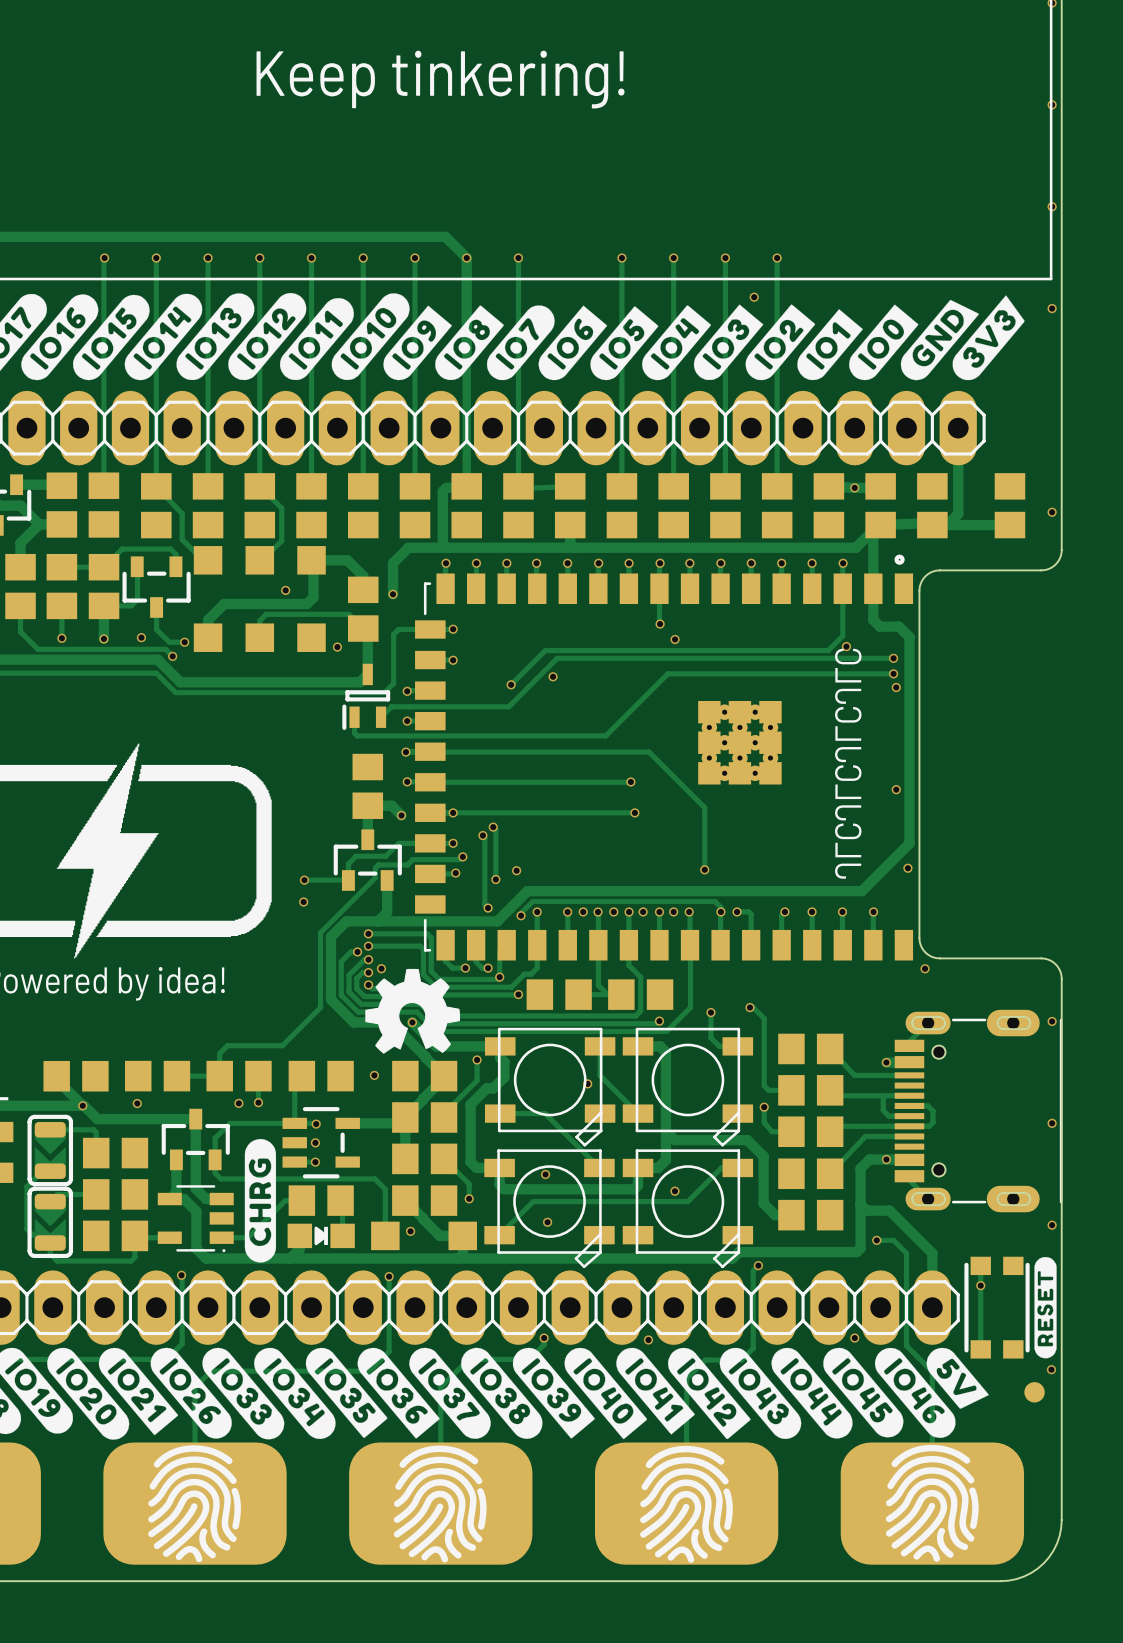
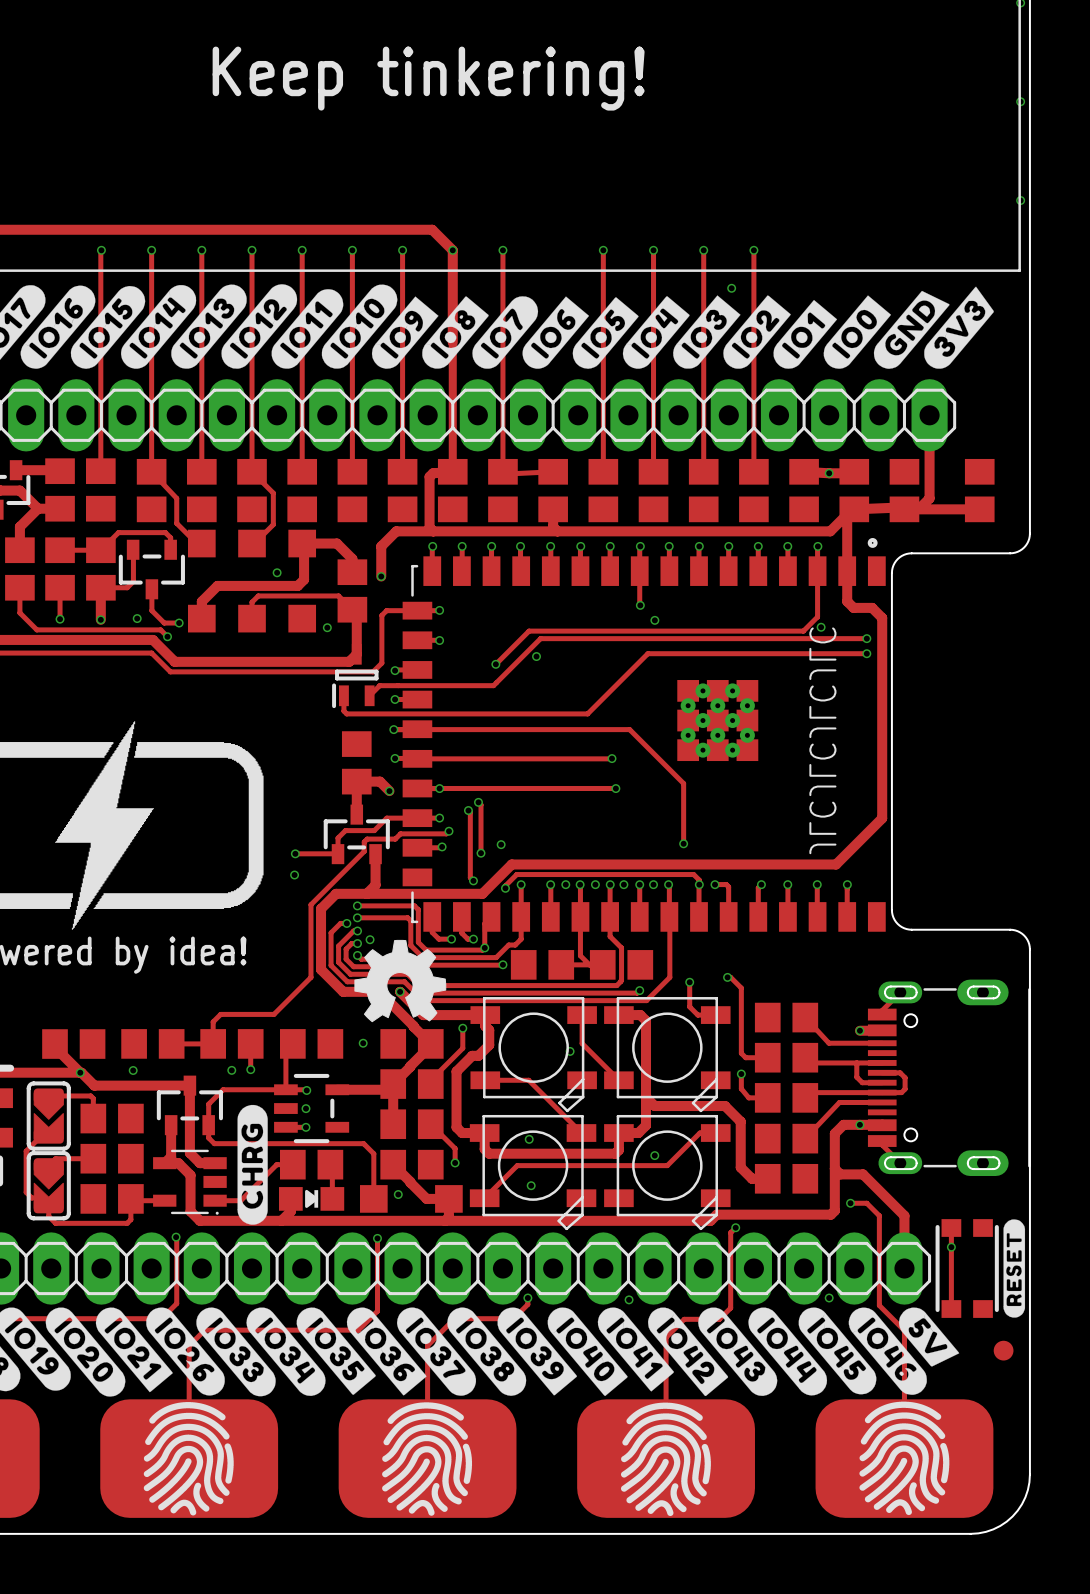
via: (1052, 308) -> none
via: (1052, 512) -> none
via: (896, 687) -> none
via: (896, 789) -> none
via: (907, 868) -> none
via: (925, 968) -> none
via: (1052, 1021) -> none
via: (1052, 1123) -> none
via: (1052, 1225) -> none
via: (1051, 1369) -> none

